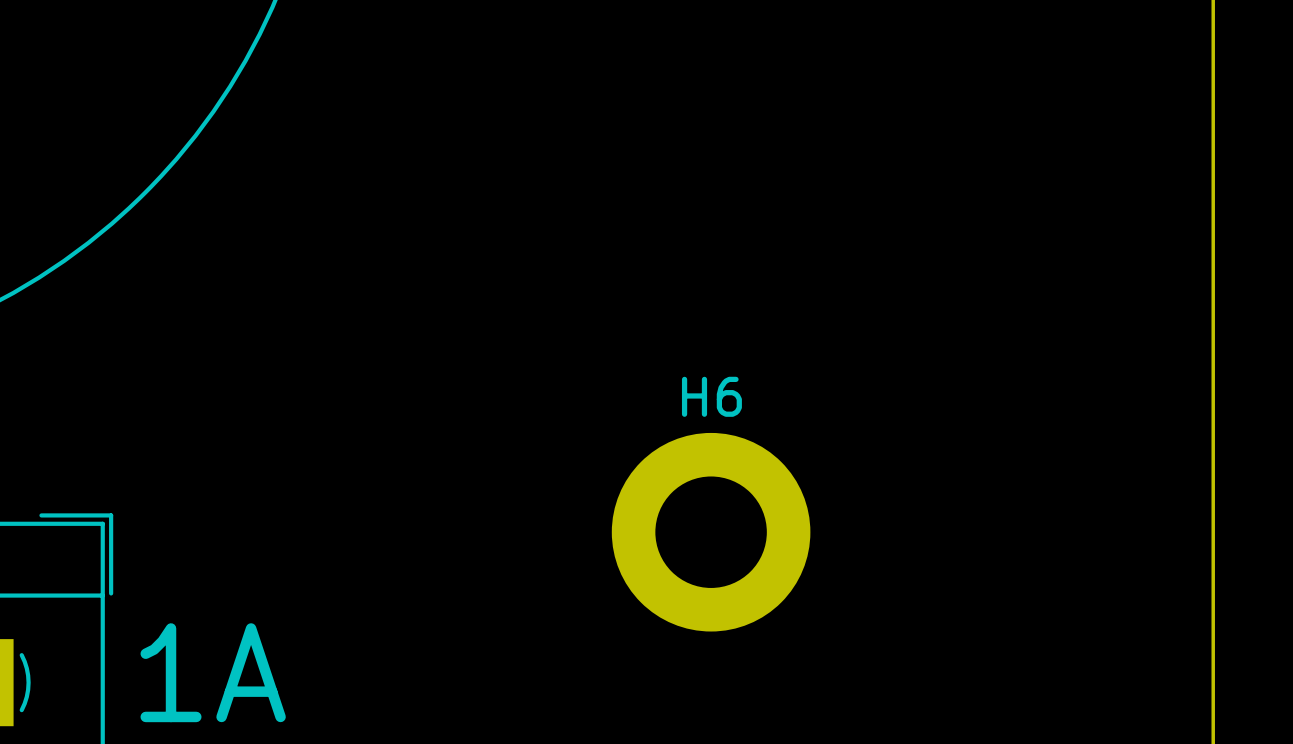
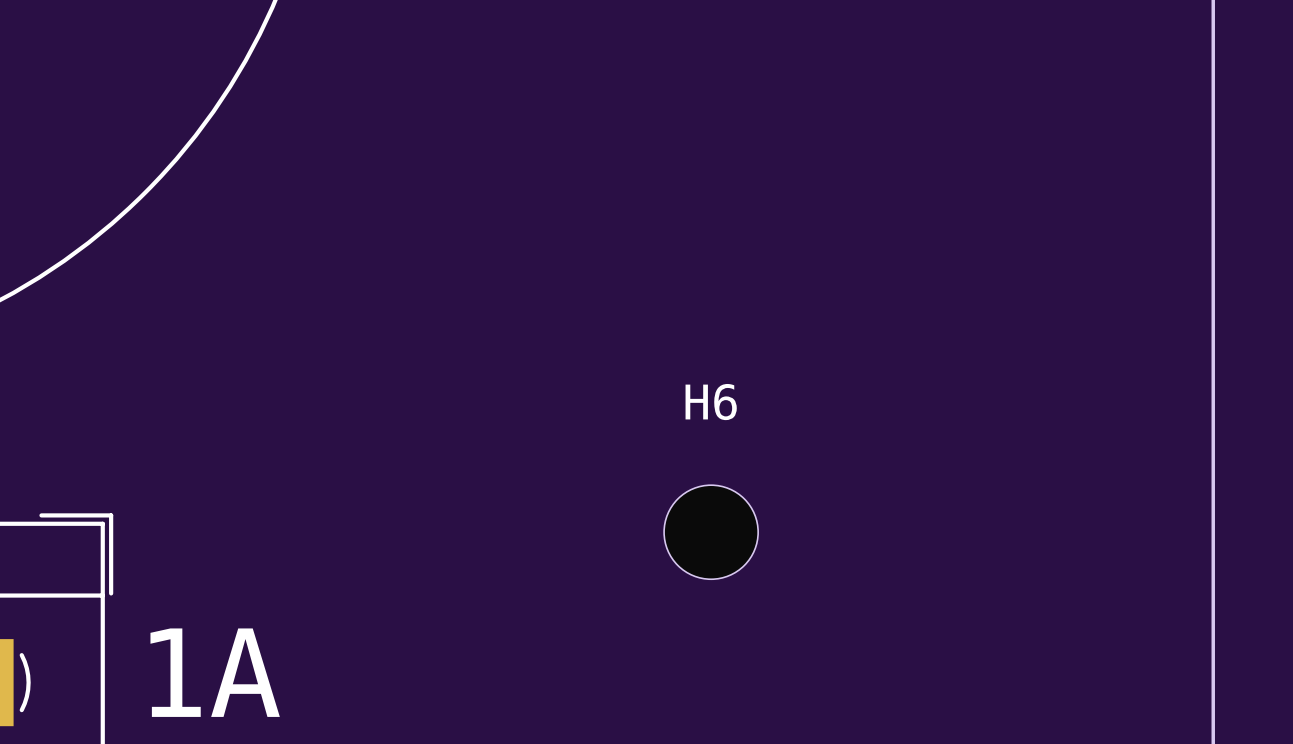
H6 footprint: [611, 432, 811, 632] -> [664, 485, 759, 580]

